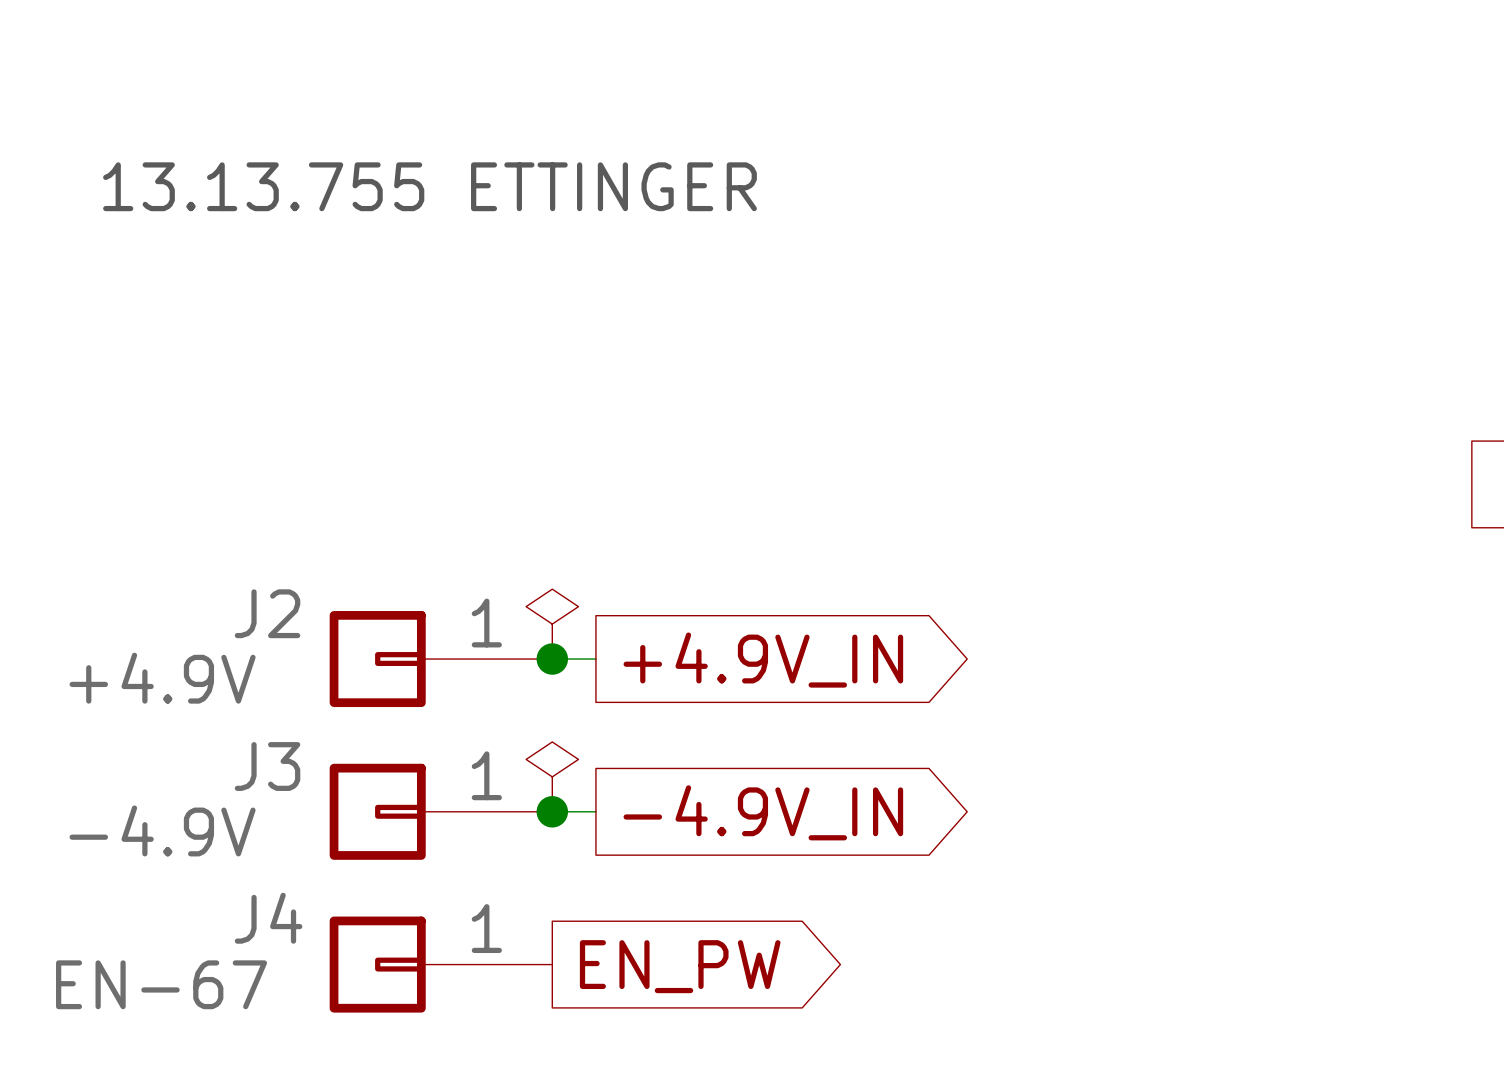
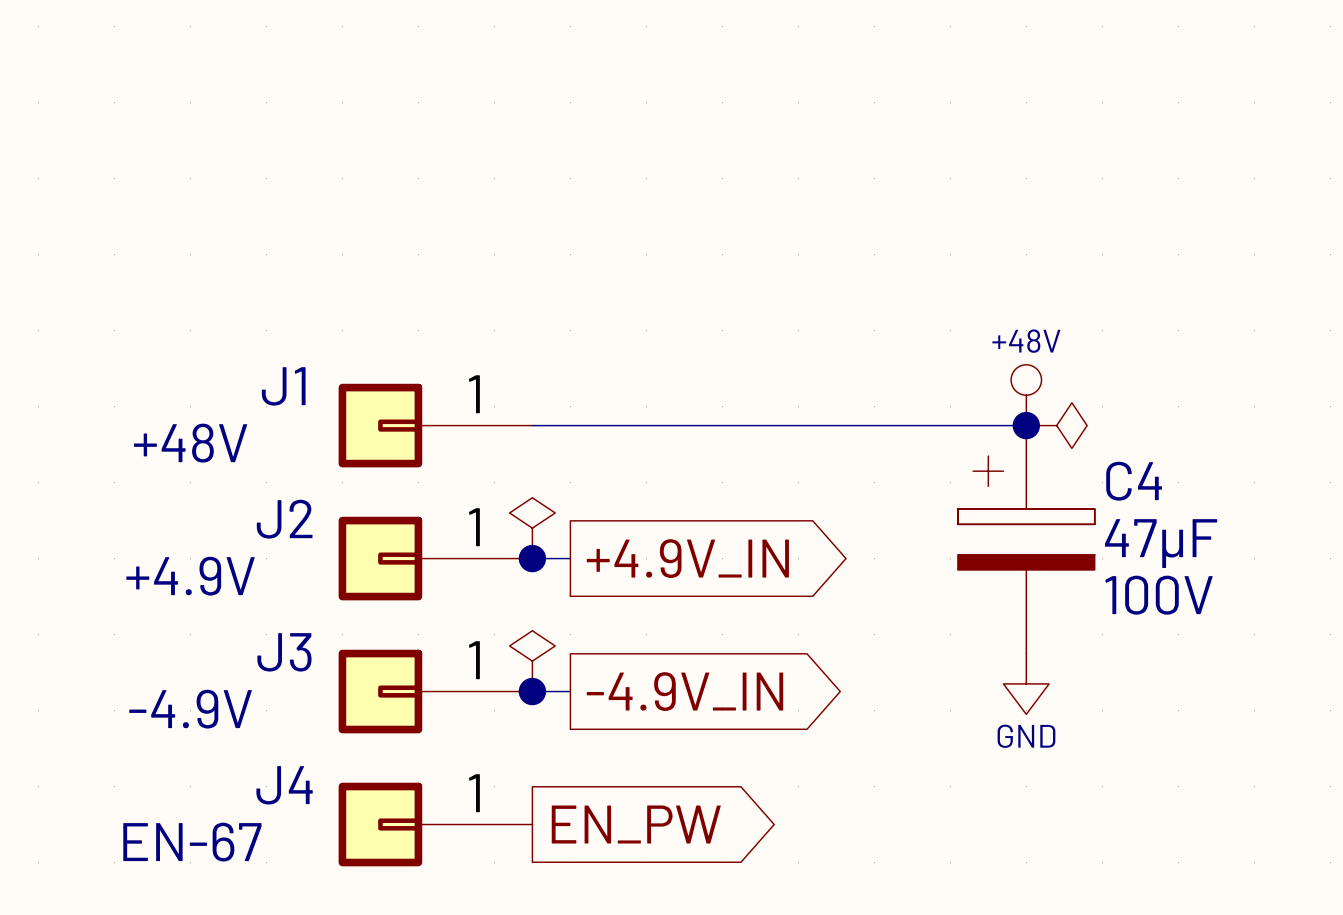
text: 13.13.755 ETTINGER (429, 186) -> none
power symbol: none -> +48V (1026, 395)
J1: none -> +48V (435, 425)
wire: none -> (532, 425) (1026, 425)
junction: none -> (1026, 425)
power symbol: none -> (1056, 425)
C4: none -> (1026, 539)
power symbol: none -> GND (1026, 683)

